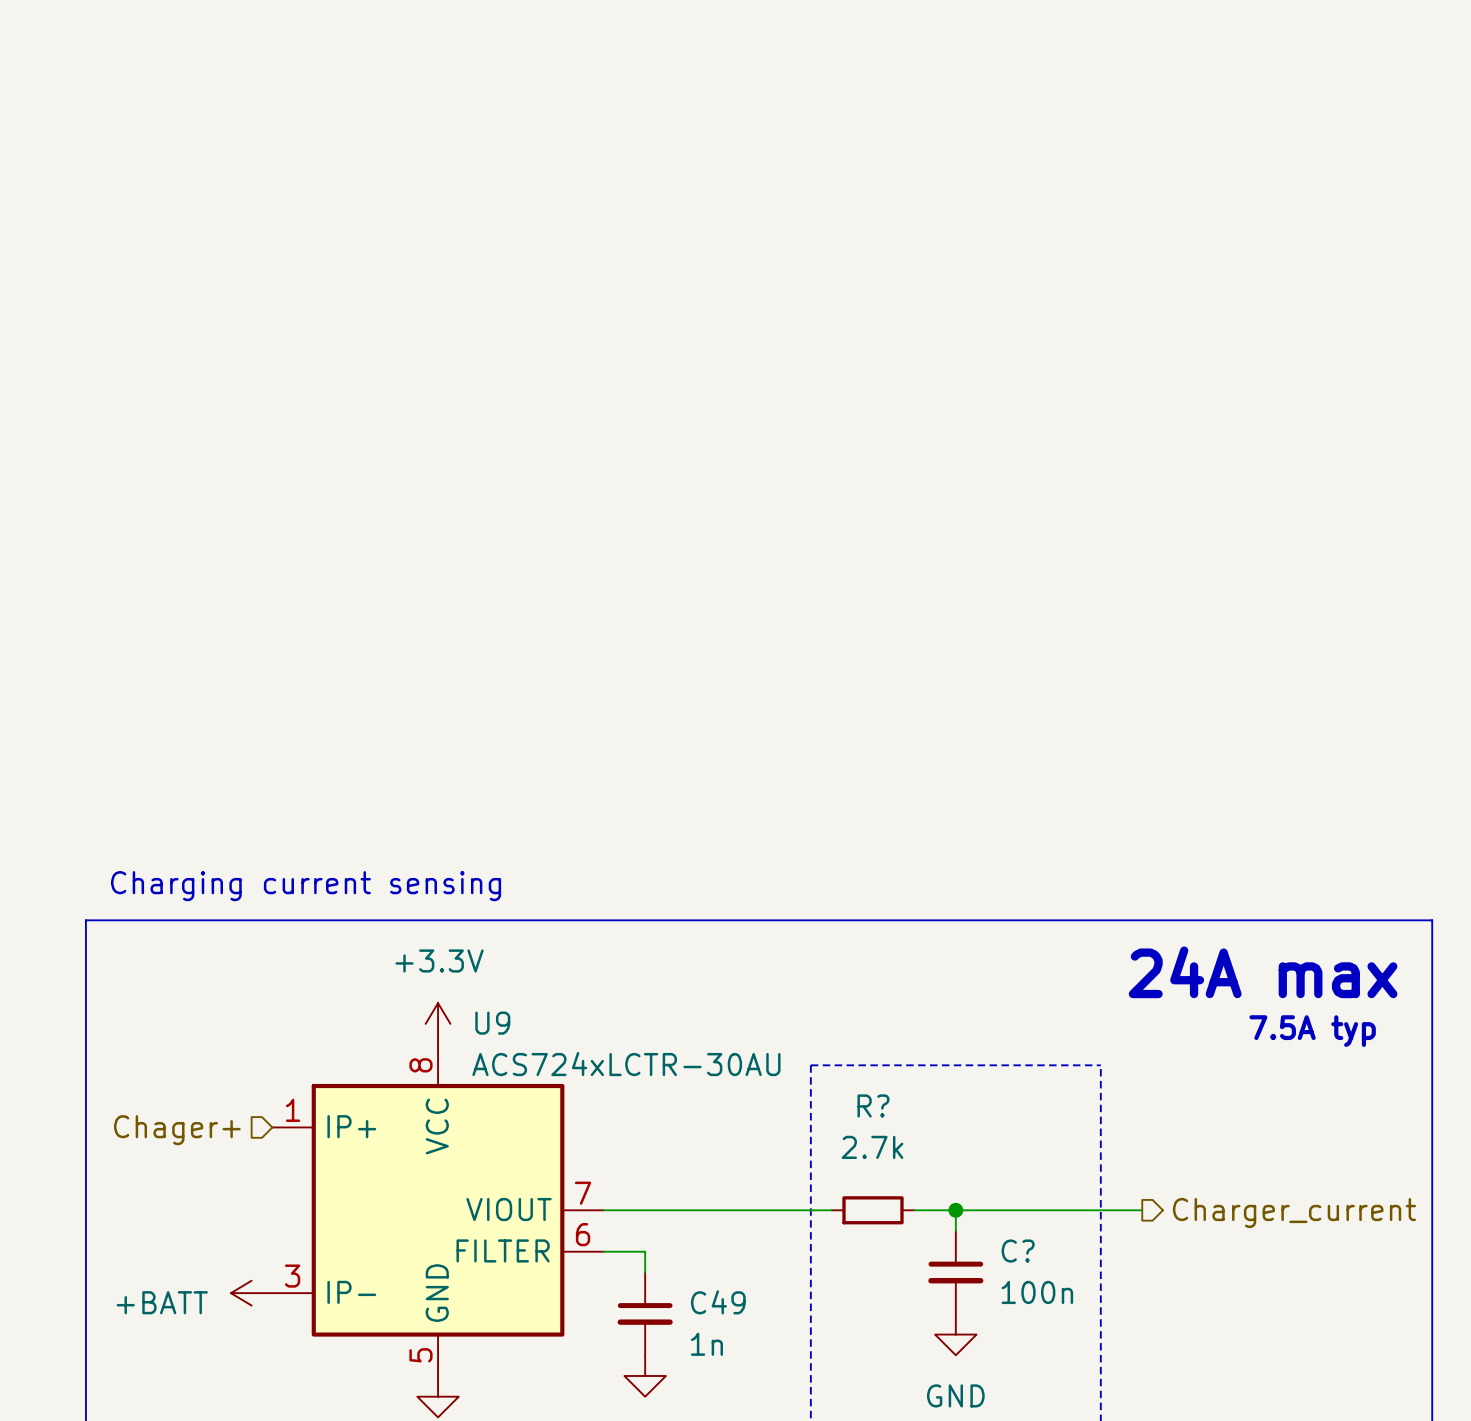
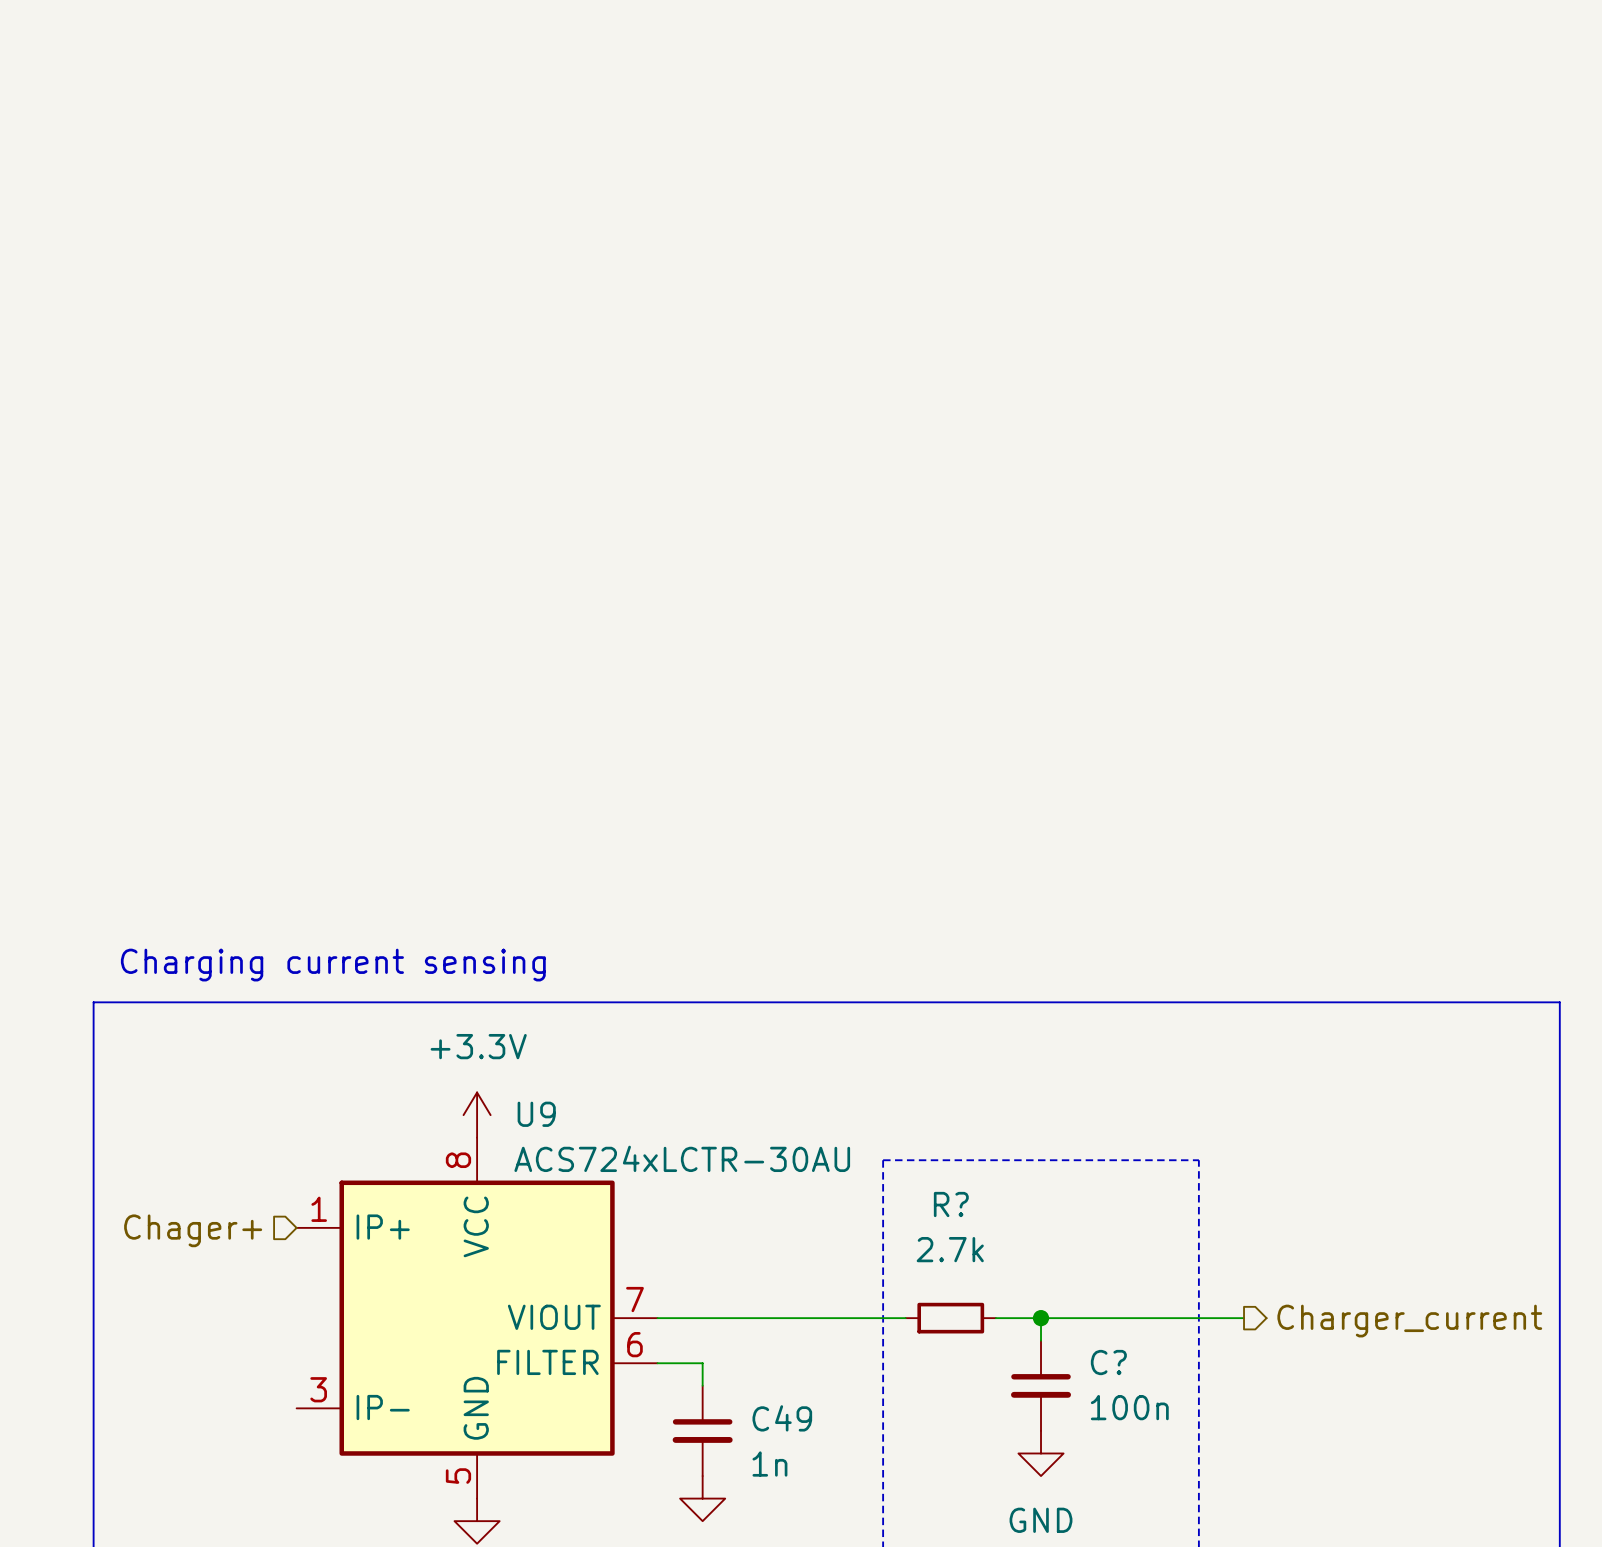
text: 24A max (1263, 972) -> none
text: 7.5A typ (1312, 1031) -> none
power symbol: +BATT (251, 1293) -> none

